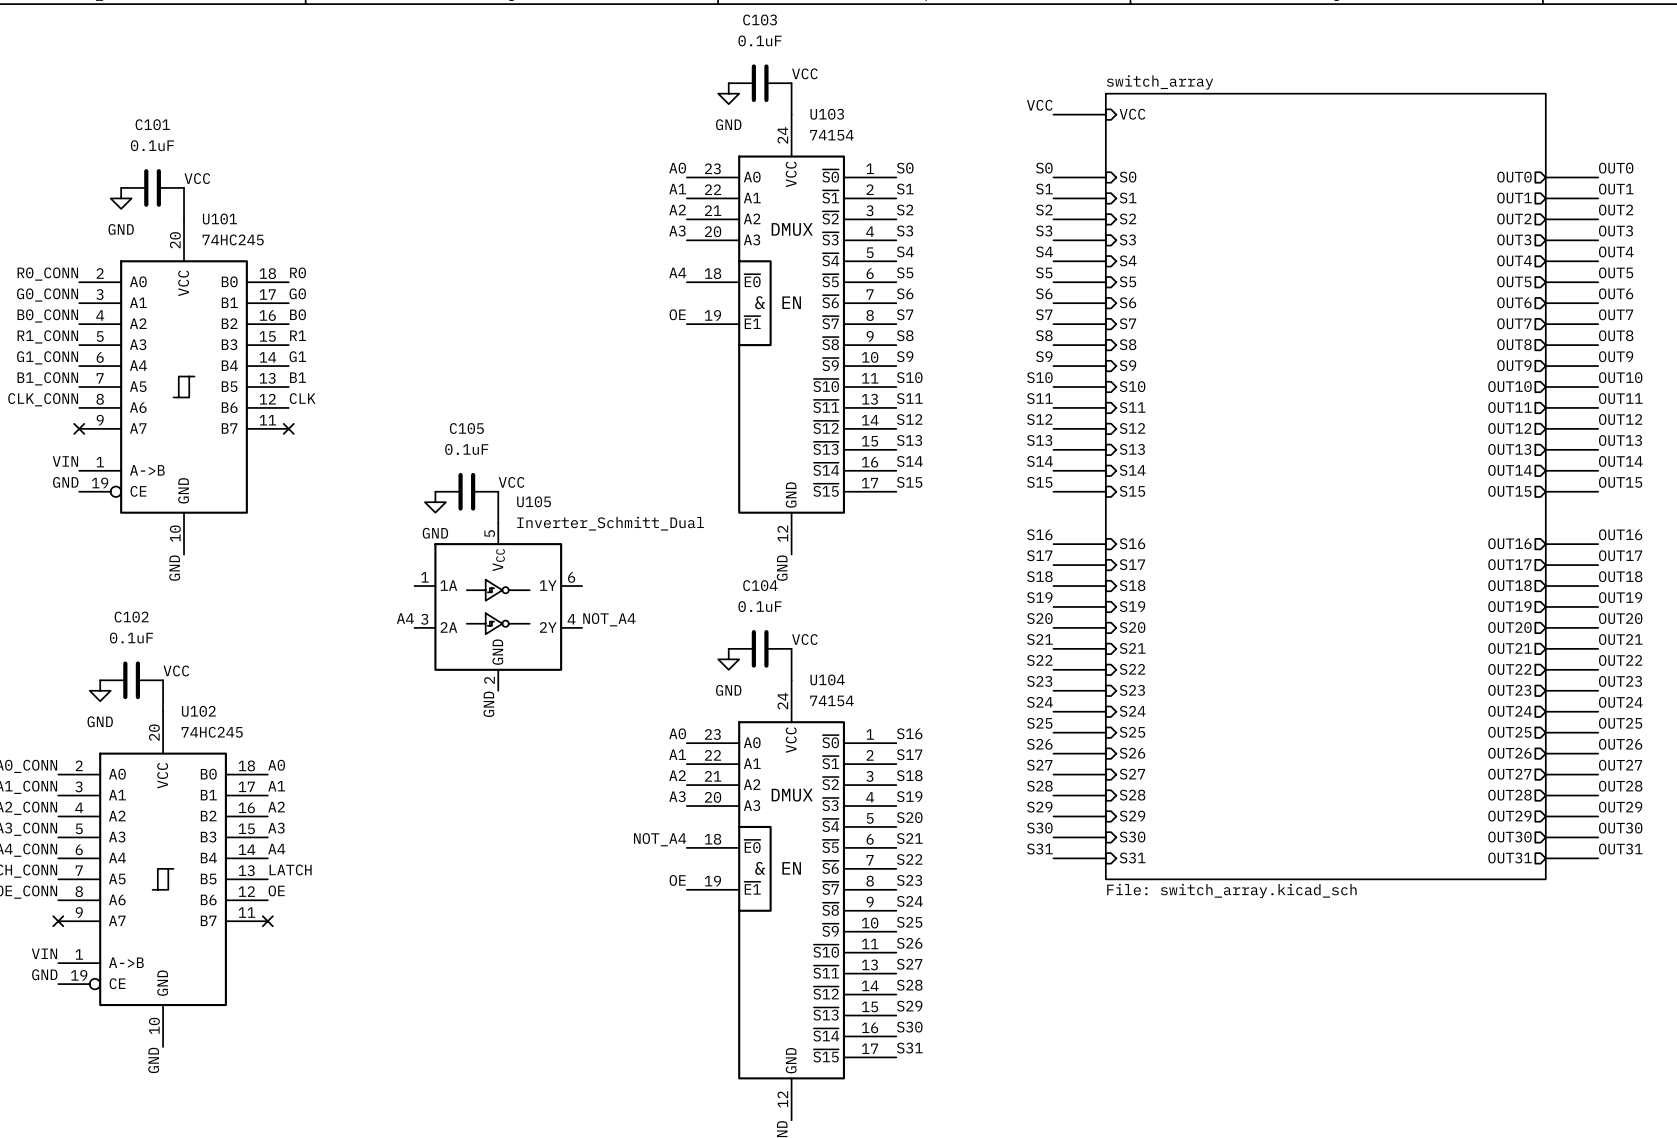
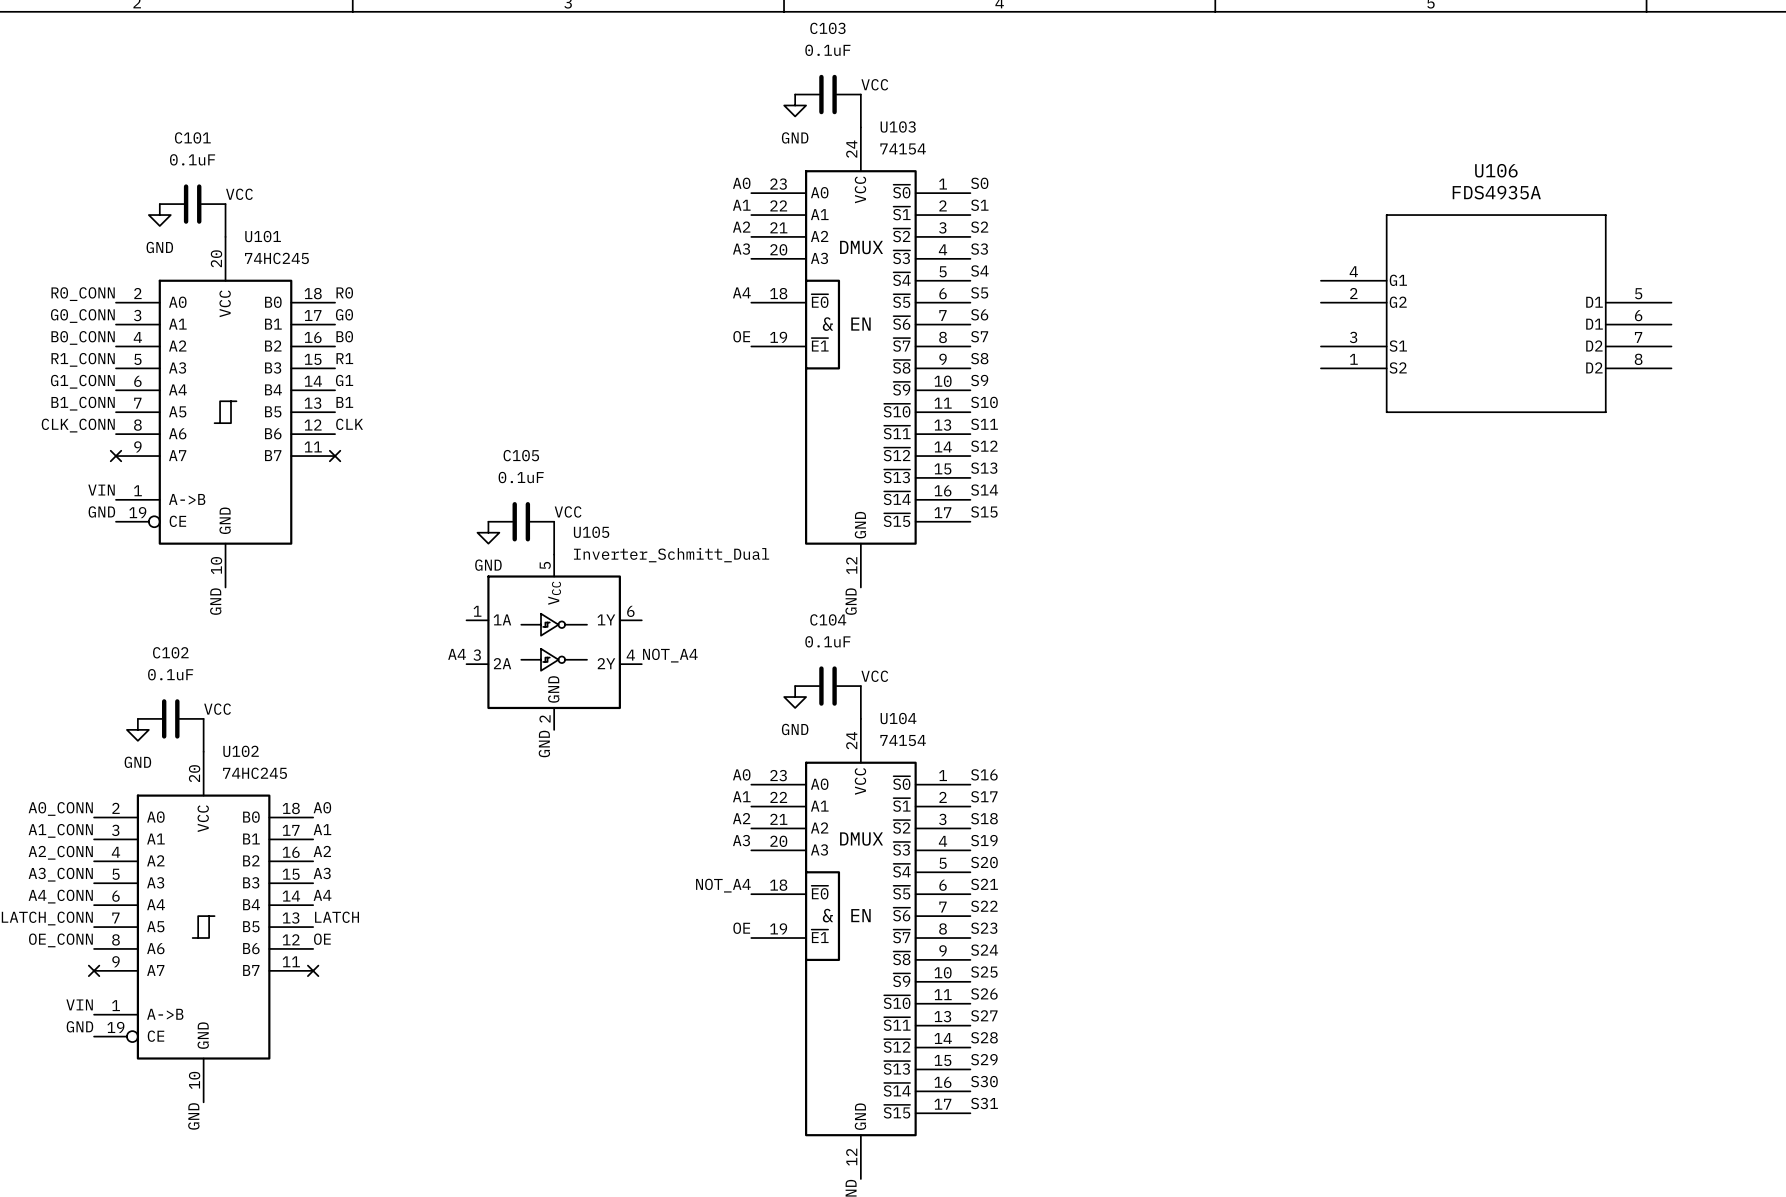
label: VCC (1039, 105) -> none
wire: (1053, 114) (1105, 114) -> none
sheet pin: VCC (1132, 114) -> none
label: S0 (1044, 168) -> none
label: OUT0 (1616, 168) -> none
wire: (1053, 177) (1105, 177) -> none
sheet pin: S0 (1128, 177) -> none
sheet pin: OUT0 (1514, 177) -> none
wire: (1545, 177) (1598, 177) -> none
label: S1 (1044, 189) -> none
label: OUT1 (1616, 189) -> none
wire: (1053, 198) (1105, 198) -> none
sheet pin: S1 (1128, 198) -> none
sheet pin: OUT1 (1514, 198) -> none
wire: (1545, 198) (1598, 198) -> none
label: S2 (1044, 210) -> none
label: OUT2 (1616, 210) -> none
sheet pin: S2 (1128, 218) -> none
sheet pin: OUT2 (1514, 218) -> none
wire: (1053, 219) (1105, 219) -> none
wire: (1545, 219) (1598, 219) -> none
label: S3 (1044, 230) -> none
label: OUT3 (1615, 230) -> none
sheet pin: S3 (1127, 239) -> none
sheet pin: OUT3 (1514, 239) -> none
wire: (1053, 240) (1105, 240) -> none
wire: (1545, 240) (1598, 240) -> none
label: S4 (1044, 251) -> none
label: OUT4 (1616, 251) -> none
sheet pin: S4 (1128, 260) -> none
sheet pin: OUT4 (1514, 260) -> none
wire: (1053, 261) (1105, 261) -> none
wire: (1545, 261) (1598, 261) -> none
label: S5 (1044, 272) -> none
label: OUT5 (1616, 272) -> none
sheet pin: S5 (1127, 281) -> none
sheet pin: OUT5 (1514, 281) -> none
wire: (1053, 282) (1105, 282) -> none
wire: (1545, 282) (1598, 282) -> none
U106: none -> FDS4935A (1496, 313)
label: S6 (1044, 293) -> none
label: OUT6 (1616, 293) -> none
sheet pin: S6 (1128, 302) -> none
sheet pin: OUT6 (1514, 302) -> none
wire: (1053, 303) (1105, 303) -> none
wire: (1545, 303) (1598, 303) -> none
label: S7 (1044, 314) -> none
label: OUT7 (1616, 314) -> none
sheet pin: S7 (1127, 323) -> none
sheet pin: OUT7 (1514, 323) -> none
wire: (1053, 324) (1105, 324) -> none
wire: (1545, 324) (1598, 324) -> none
label: S8 (1044, 335) -> none
label: OUT8 (1616, 335) -> none
sheet pin: S8 (1128, 344) -> none
sheet pin: OUT8 (1514, 344) -> none
wire: (1053, 345) (1105, 345) -> none
wire: (1545, 345) (1598, 345) -> none
label: S9 (1044, 356) -> none
label: OUT9 (1616, 356) -> none
sheet pin: S9 (1128, 365) -> none
sheet pin: OUT9 (1514, 365) -> none
wire: (1053, 366) (1105, 366) -> none
wire: (1545, 366) (1598, 366) -> none
label: S10 (1039, 377) -> none
label: OUT10 (1620, 377) -> none
wire: (1053, 386) (1105, 386) -> none
sheet pin: S10 (1132, 386) -> none
sheet pin: OUT10 (1509, 386) -> none
wire: (1545, 386) (1598, 386) -> none
label: S11 (1039, 398) -> none
label: OUT11 (1620, 398) -> none
wire: (1053, 407) (1105, 407) -> none
sheet pin: S11 (1132, 407) -> none
sheet pin: OUT11 (1510, 407) -> none
wire: (1545, 407) (1598, 407) -> none
label: S12 (1039, 419) -> none
label: OUT12 (1620, 419) -> none
wire: (1053, 428) (1105, 428) -> none
sheet pin: S12 (1132, 428) -> none
sheet pin: OUT12 (1509, 428) -> none
wire: (1545, 428) (1598, 428) -> none
label: S13 (1039, 440) -> none
label: OUT13 (1620, 440) -> none
wire: (1053, 449) (1105, 449) -> none
sheet pin: S13 (1132, 449) -> none
sheet pin: OUT13 (1509, 449) -> none
wire: (1545, 449) (1598, 449) -> none
label: S14 (1040, 461) -> none
label: OUT14 (1620, 461) -> none
wire: (1053, 470) (1105, 470) -> none
sheet pin: S14 (1132, 470) -> none
sheet pin: OUT14 (1510, 470) -> none
wire: (1545, 470) (1598, 470) -> none
label: S15 (1039, 482) -> none
label: OUT15 (1620, 482) -> none
sheet switch_array: File: switch_array.kicad_sch (1325, 486) -> none
wire: (1053, 491) (1105, 491) -> none
sheet pin: S15 (1132, 491) -> none
sheet pin: OUT15 (1509, 491) -> none
wire: (1545, 491) (1598, 491) -> none
label: S16 (1039, 534) -> none
label: OUT16 (1620, 534) -> none
sheet pin: S16 (1132, 543) -> none
sheet pin: OUT16 (1509, 543) -> none
wire: (1053, 544) (1105, 544) -> none
wire: (1545, 544) (1598, 544) -> none
label: S17 (1039, 555) -> none
label: OUT17 (1620, 555) -> none
sheet pin: S17 (1132, 564) -> none
sheet pin: OUT17 (1509, 564) -> none
wire: (1053, 565) (1105, 565) -> none
wire: (1545, 565) (1598, 565) -> none
label: S18 (1039, 576) -> none
label: OUT18 (1620, 576) -> none
sheet pin: S18 (1132, 585) -> none
sheet pin: OUT18 (1509, 585) -> none
wire: (1053, 586) (1105, 586) -> none
wire: (1545, 586) (1598, 586) -> none
label: S19 (1039, 597) -> none
label: OUT19 (1620, 597) -> none
wire: (1053, 606) (1105, 606) -> none
sheet pin: S19 (1132, 606) -> none
sheet pin: OUT19 (1509, 606) -> none
wire: (1545, 606) (1598, 606) -> none
label: S20 (1039, 618) -> none
label: OUT20 (1620, 618) -> none
wire: (1053, 627) (1105, 627) -> none
sheet pin: S20 (1132, 627) -> none
sheet pin: OUT20 (1509, 627) -> none
wire: (1545, 627) (1598, 627) -> none
label: S21 (1039, 639) -> none
label: OUT21 (1620, 639) -> none
wire: (1053, 648) (1105, 648) -> none
sheet pin: S21 (1132, 648) -> none
sheet pin: OUT21 (1510, 648) -> none
wire: (1545, 648) (1598, 648) -> none
label: S22 (1039, 660) -> none
label: OUT22 (1620, 660) -> none
wire: (1053, 669) (1105, 669) -> none
sheet pin: S22 (1132, 669) -> none
sheet pin: OUT22 (1509, 669) -> none
wire: (1545, 669) (1598, 669) -> none
label: S23 (1039, 681) -> none
label: OUT23 (1620, 681) -> none
wire: (1053, 690) (1105, 690) -> none
sheet pin: S23 (1132, 690) -> none
sheet pin: OUT23 (1509, 690) -> none
wire: (1545, 690) (1598, 690) -> none
label: S24 (1040, 702) -> none
label: OUT24 (1620, 702) -> none
wire: (1053, 711) (1105, 711) -> none
sheet pin: S24 (1132, 711) -> none
sheet pin: OUT24 (1510, 711) -> none
wire: (1545, 711) (1598, 711) -> none
label: S25 (1039, 723) -> none
label: OUT25 (1620, 723) -> none
wire: (1053, 732) (1105, 732) -> none
sheet pin: S25 (1132, 732) -> none
sheet pin: OUT25 (1509, 732) -> none
wire: (1545, 732) (1598, 732) -> none
label: S26 (1039, 744) -> none
label: OUT26 (1620, 744) -> none
wire: (1053, 753) (1105, 753) -> none
sheet pin: S26 (1132, 753) -> none
sheet pin: OUT26 (1509, 753) -> none
wire: (1545, 753) (1598, 753) -> none
label: S27 (1039, 765) -> none
label: OUT27 (1620, 765) -> none
wire: (1053, 774) (1105, 774) -> none
sheet pin: S27 (1132, 774) -> none
sheet pin: OUT27 (1509, 774) -> none
wire: (1545, 774) (1598, 774) -> none
label: S28 (1039, 786) -> none
label: OUT28 (1620, 786) -> none
wire: (1053, 795) (1105, 795) -> none
sheet pin: S28 (1132, 795) -> none
sheet pin: OUT28 (1509, 795) -> none
wire: (1545, 795) (1598, 795) -> none
label: S29 (1039, 807) -> none
label: OUT29 (1620, 807) -> none
wire: (1053, 816) (1105, 816) -> none
sheet pin: S29 (1132, 816) -> none
sheet pin: OUT29 (1509, 816) -> none
wire: (1545, 816) (1598, 816) -> none
label: S30 (1039, 828) -> none
label: OUT30 (1620, 828) -> none
wire: (1053, 837) (1105, 837) -> none
sheet pin: S30 (1132, 837) -> none
sheet pin: OUT30 (1509, 837) -> none
wire: (1545, 837) (1598, 837) -> none
label: S31 (1039, 849) -> none
label: OUT31 (1620, 849) -> none
sheet pin: S31 (1132, 857) -> none
sheet pin: OUT31 (1510, 857) -> none
wire: (1053, 858) (1105, 858) -> none
wire: (1545, 858) (1598, 858) -> none

